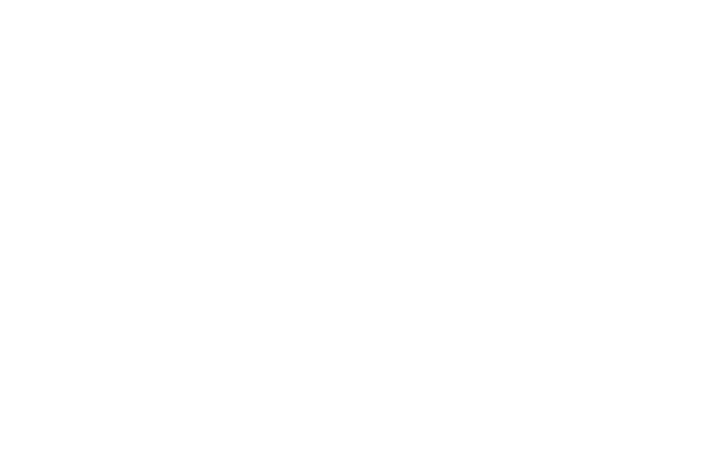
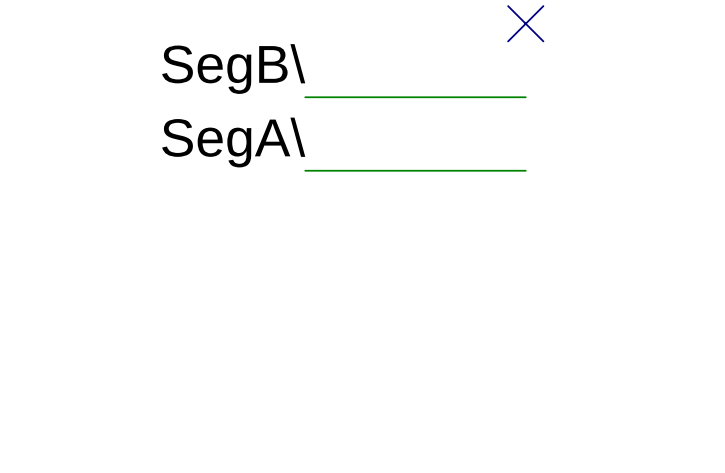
no-connect mark: none -> (525, 23)
label: none -> SegB\ (233, 69)
wire: none -> (305, 97) (525, 97)
label: none -> SegA\ (233, 142)
wire: none -> (305, 170) (525, 170)

